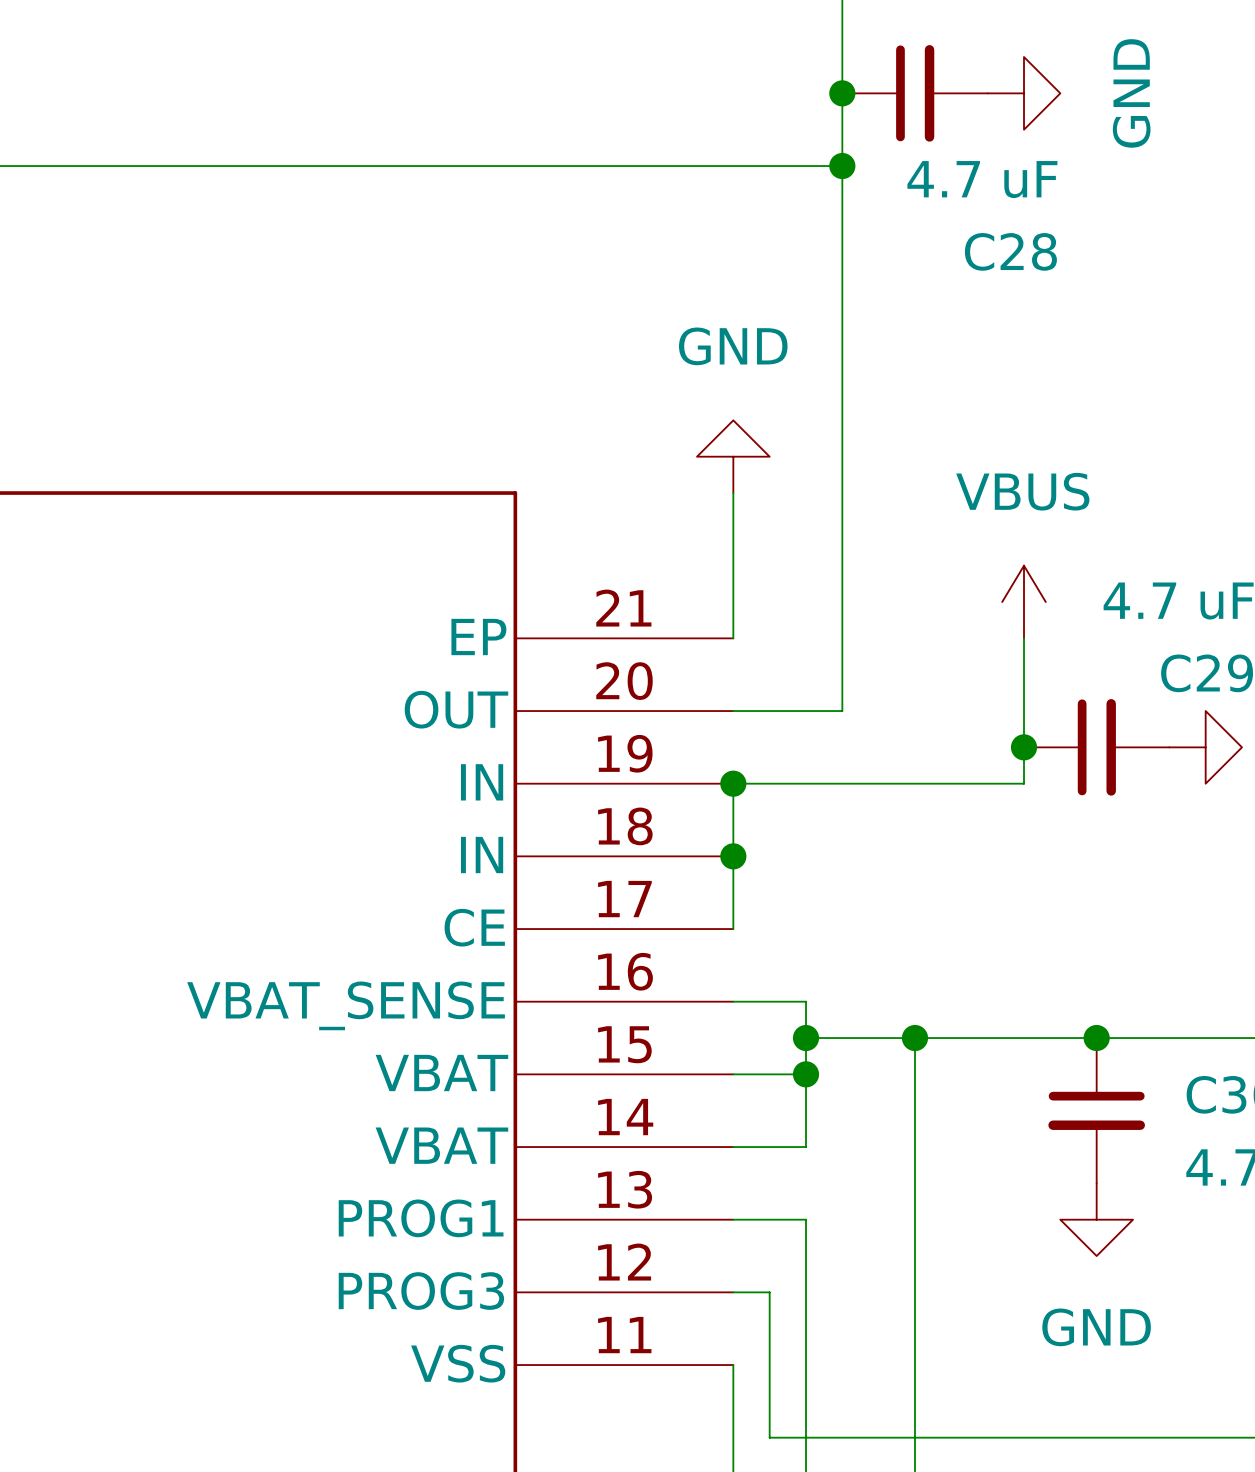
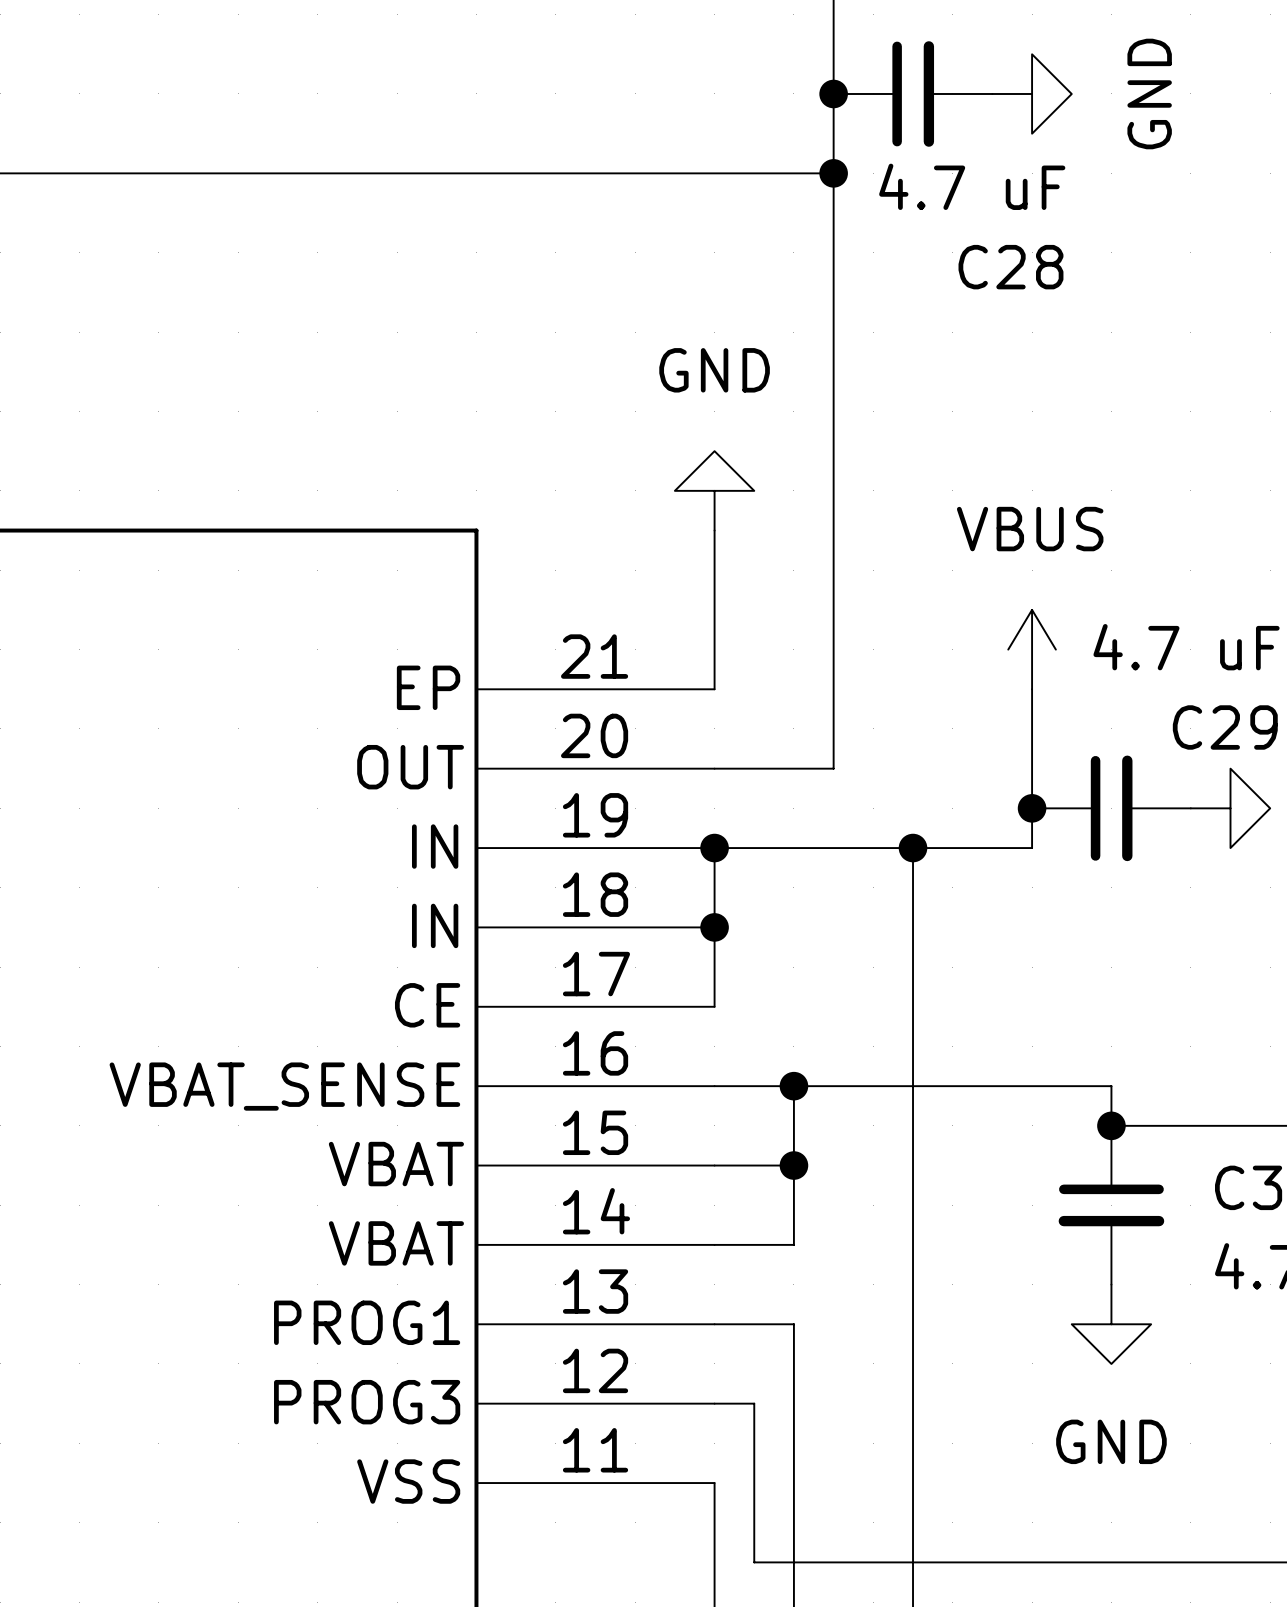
wire: none -> (913, 848) (913, 1125)
junction: none -> (913, 848)
wire: (806, 1038) (1096, 1038) -> (793, 1086) (1111, 1086) (1111, 1125)
junction position: (806, 1038) -> (793, 1086)
junction: (915, 1038) -> none

